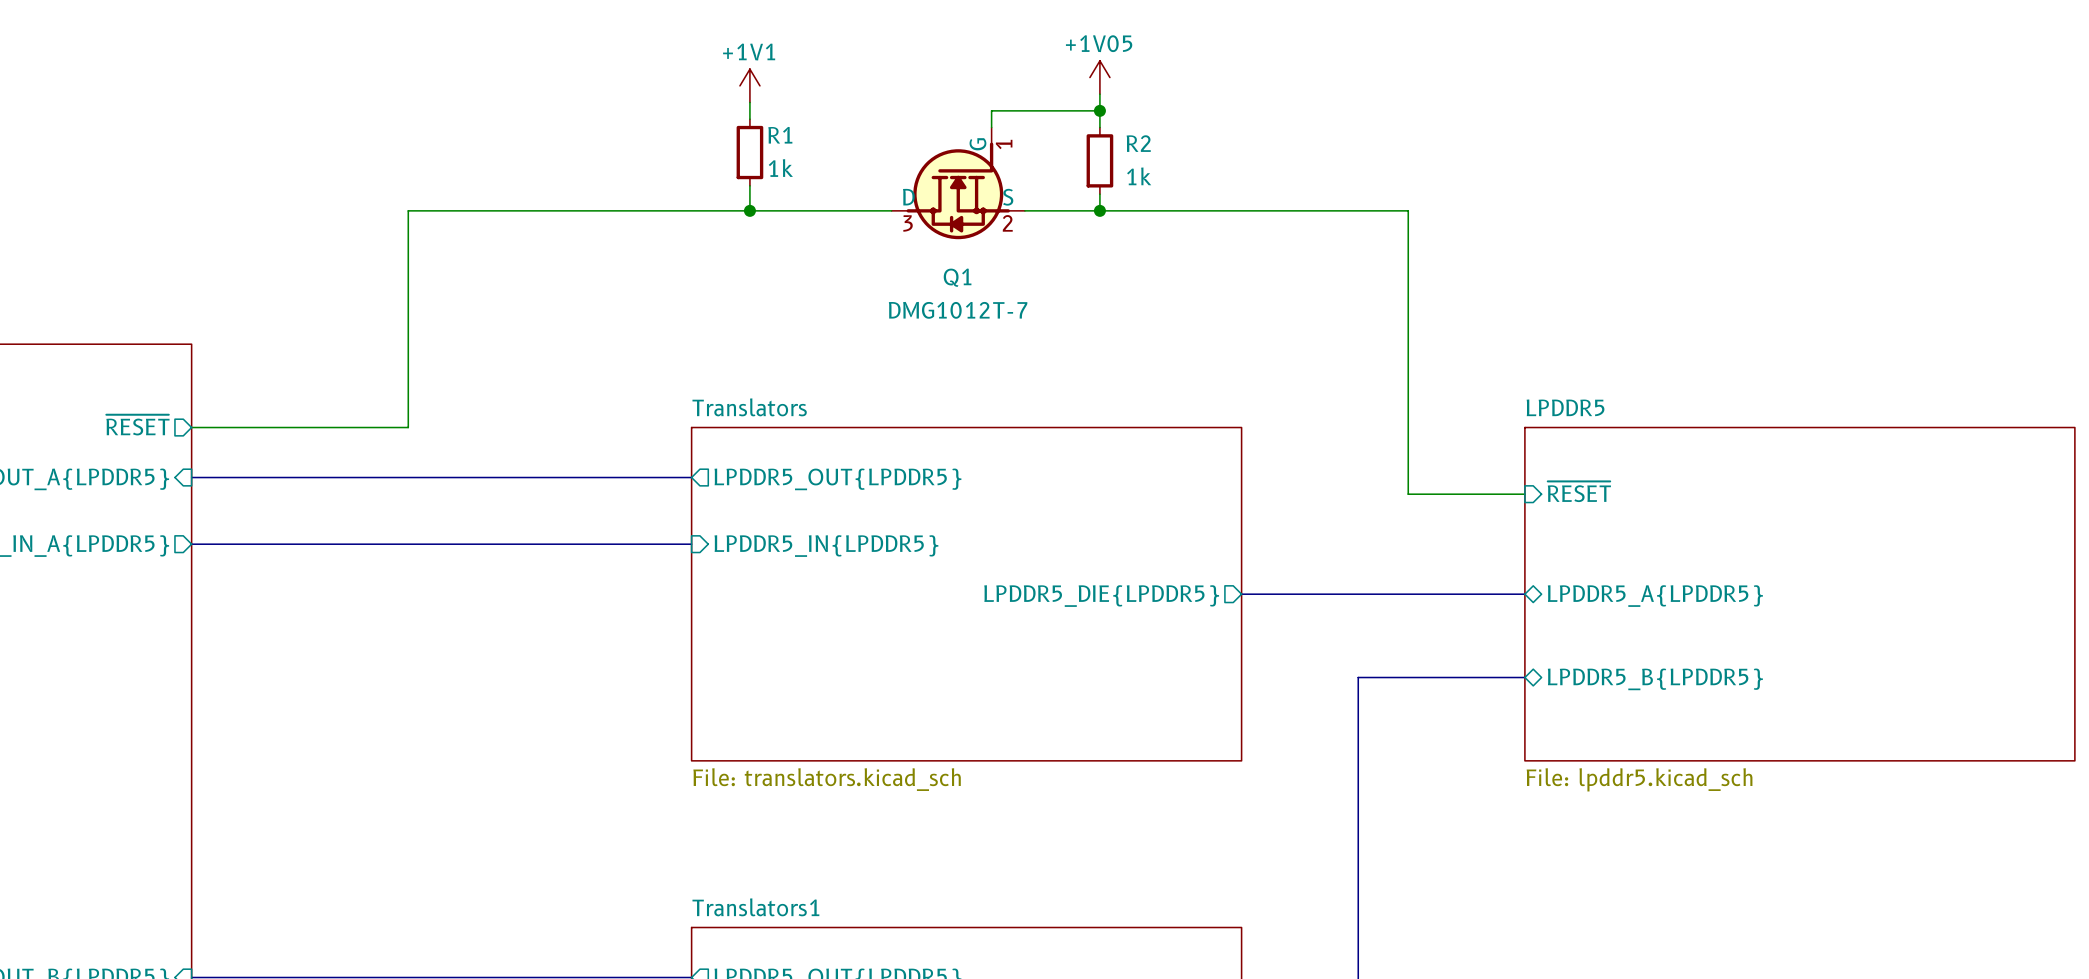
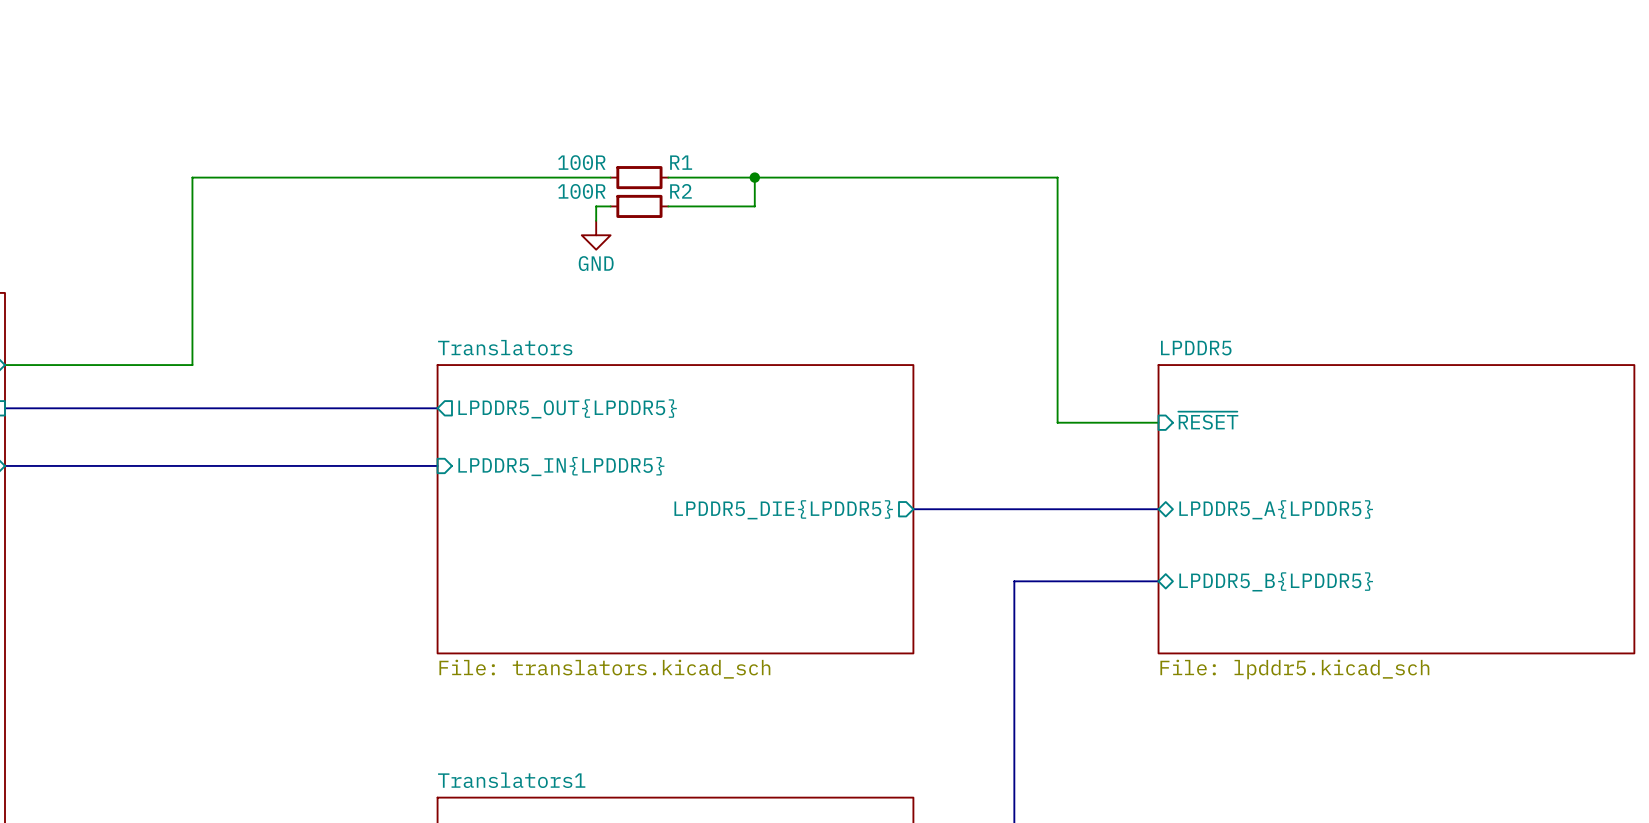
power symbol: +1V05 (1099, 77) -> none
power symbol: +1V1 (749, 85) -> none
wire: (1099, 94) (1099, 127) -> none
wire: (749, 102) (749, 119) -> none
wire: (1099, 110) (991, 110) (991, 127) -> none
junction: (1099, 110) -> none
R1 rotation: 0° (749, 152) -> 90° clockwise (639, 177)
R1 position: (749, 152) -> (639, 177)
R2 rotation: 0° (1099, 160) -> 90° clockwise (639, 206)
R2 position: (1099, 160) -> (639, 206)
R1 text: 1k (780, 168) -> 100R (581, 162)
R2 text: 1k (1139, 176) -> 100R (581, 191)
Q1: (958, 183) -> none
wire: (749, 185) (749, 210) -> none
wire: (1099, 194) (1099, 210) -> none
junction: (749, 210) -> none
wire: none -> (754, 177) (754, 206) (668, 206)
junction position: (1099, 210) -> (754, 177)
wire: none -> (610, 206) (596, 206) (596, 220)
power symbol: none -> GND (596, 235)

